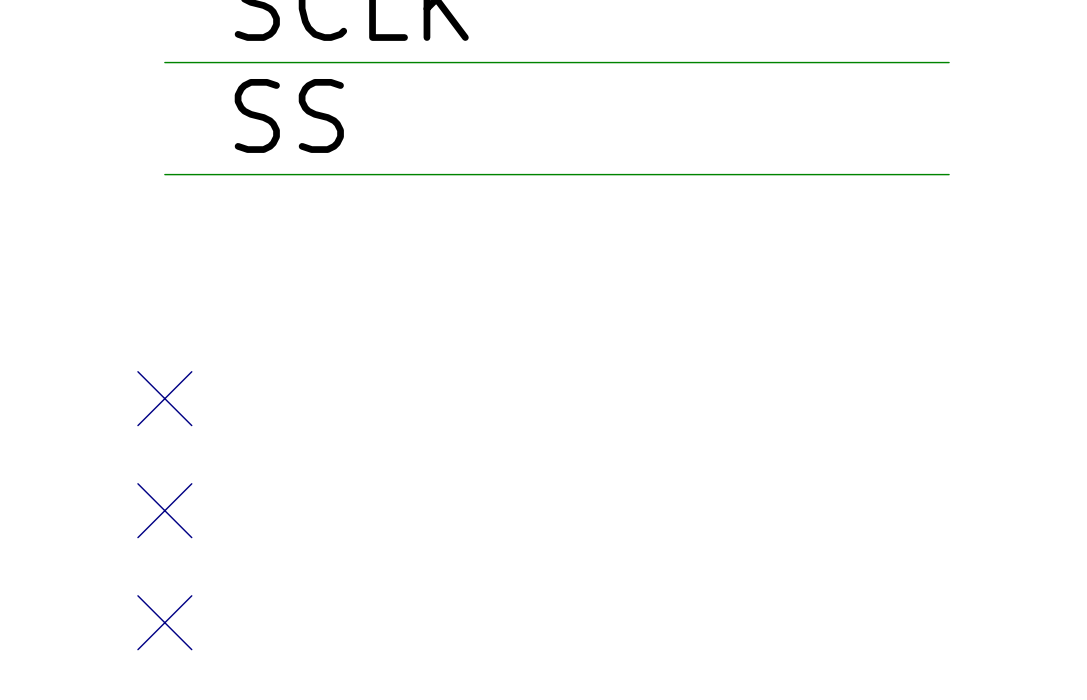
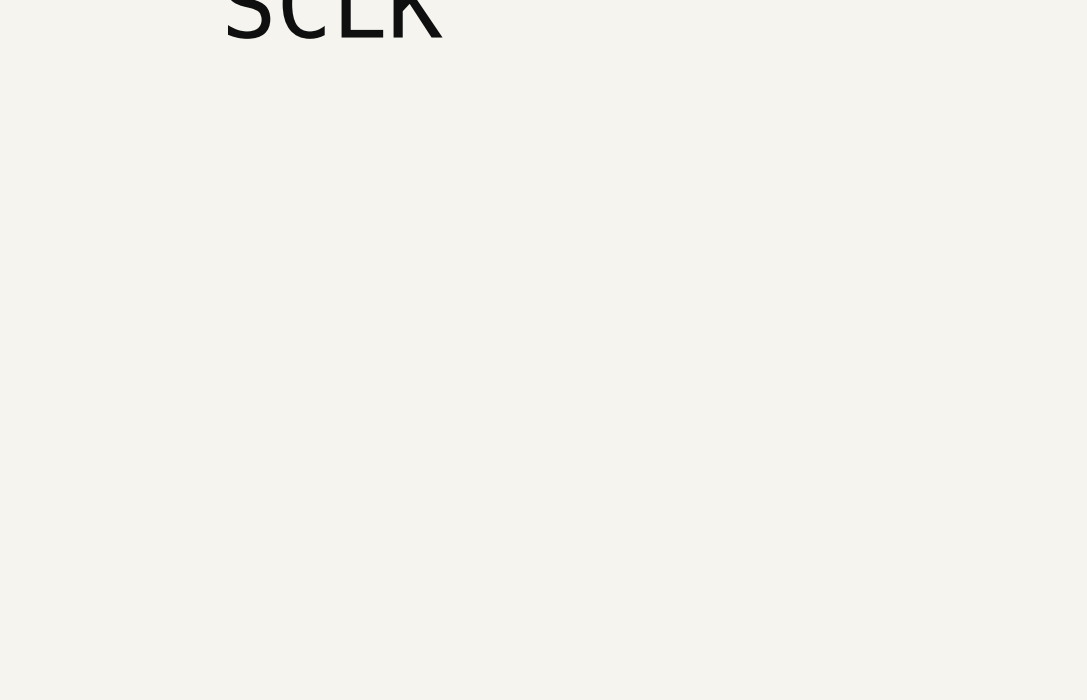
wire: (164, 62) (949, 62) -> none
label: SS (289, 115) -> none
wire: (164, 174) (949, 174) -> none
no-connect mark: (164, 398) -> none
no-connect mark: (164, 510) -> none
no-connect mark: (164, 622) -> none

